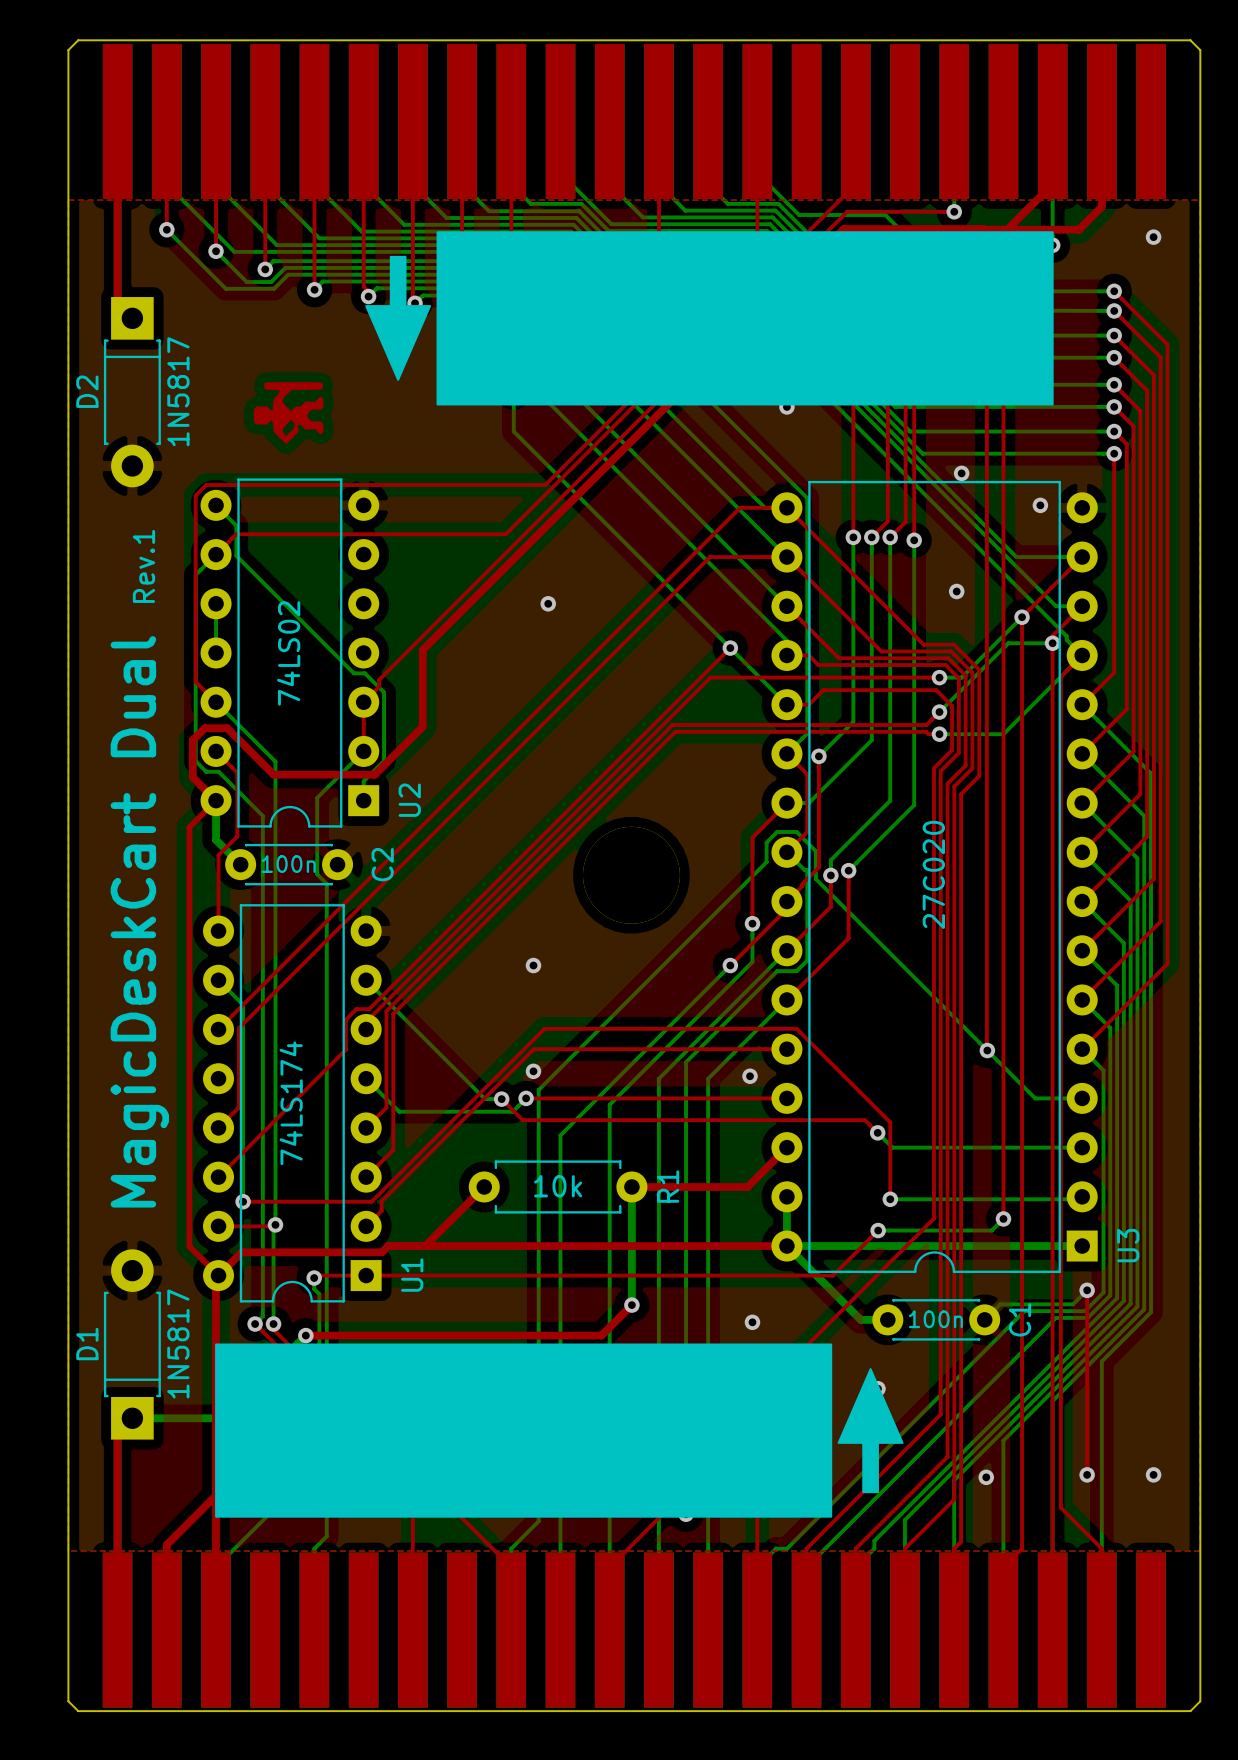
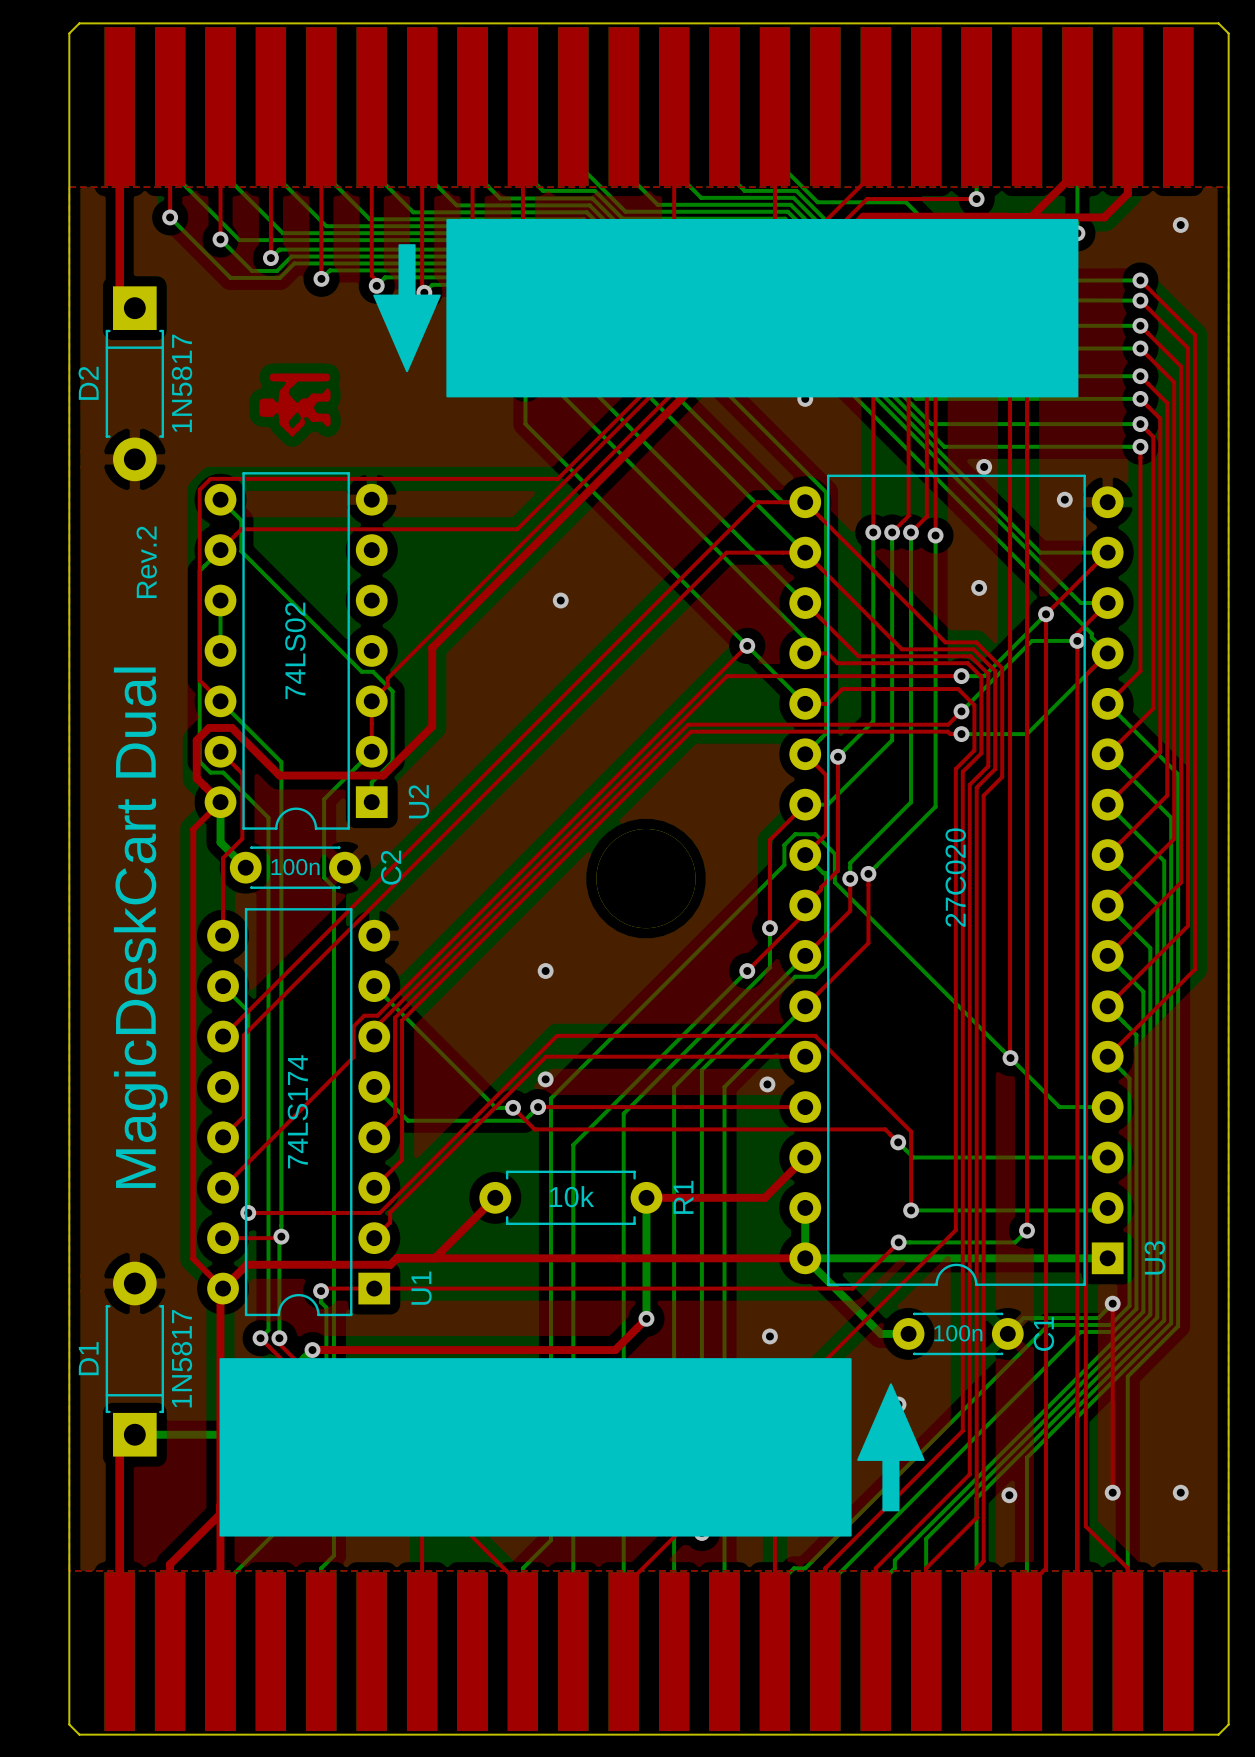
text: Rev.1 (143, 566) -> Rev.2 (146, 562)

